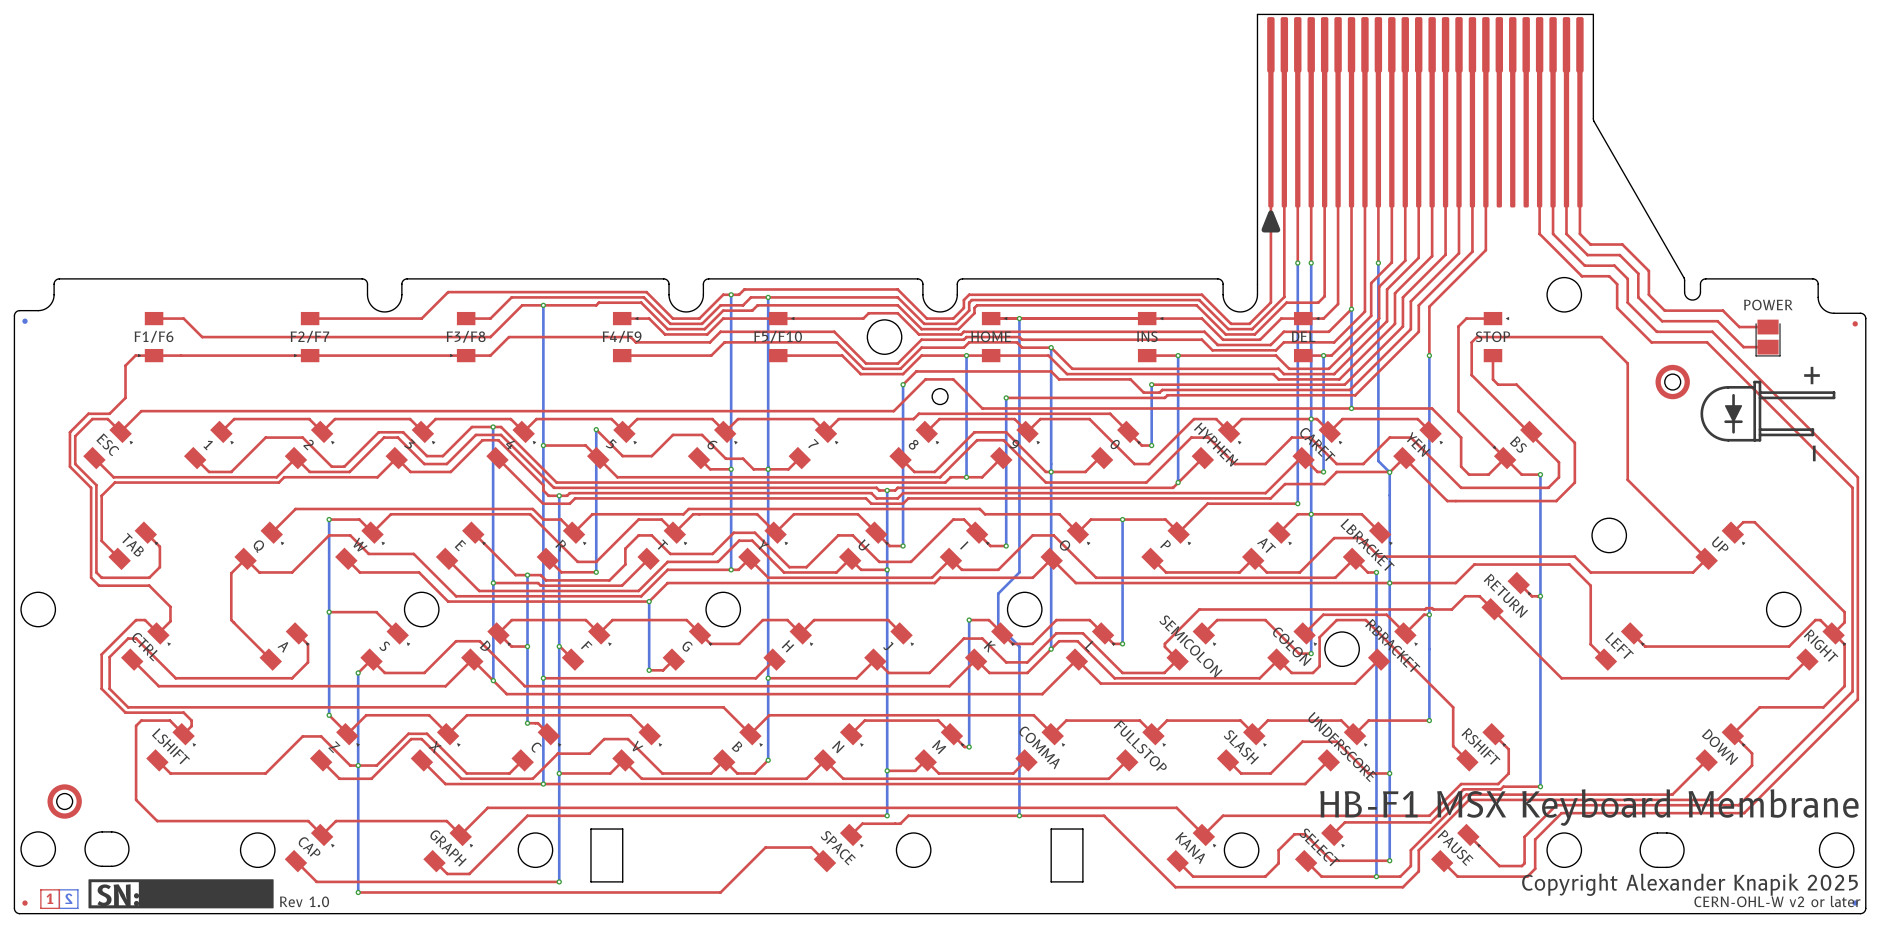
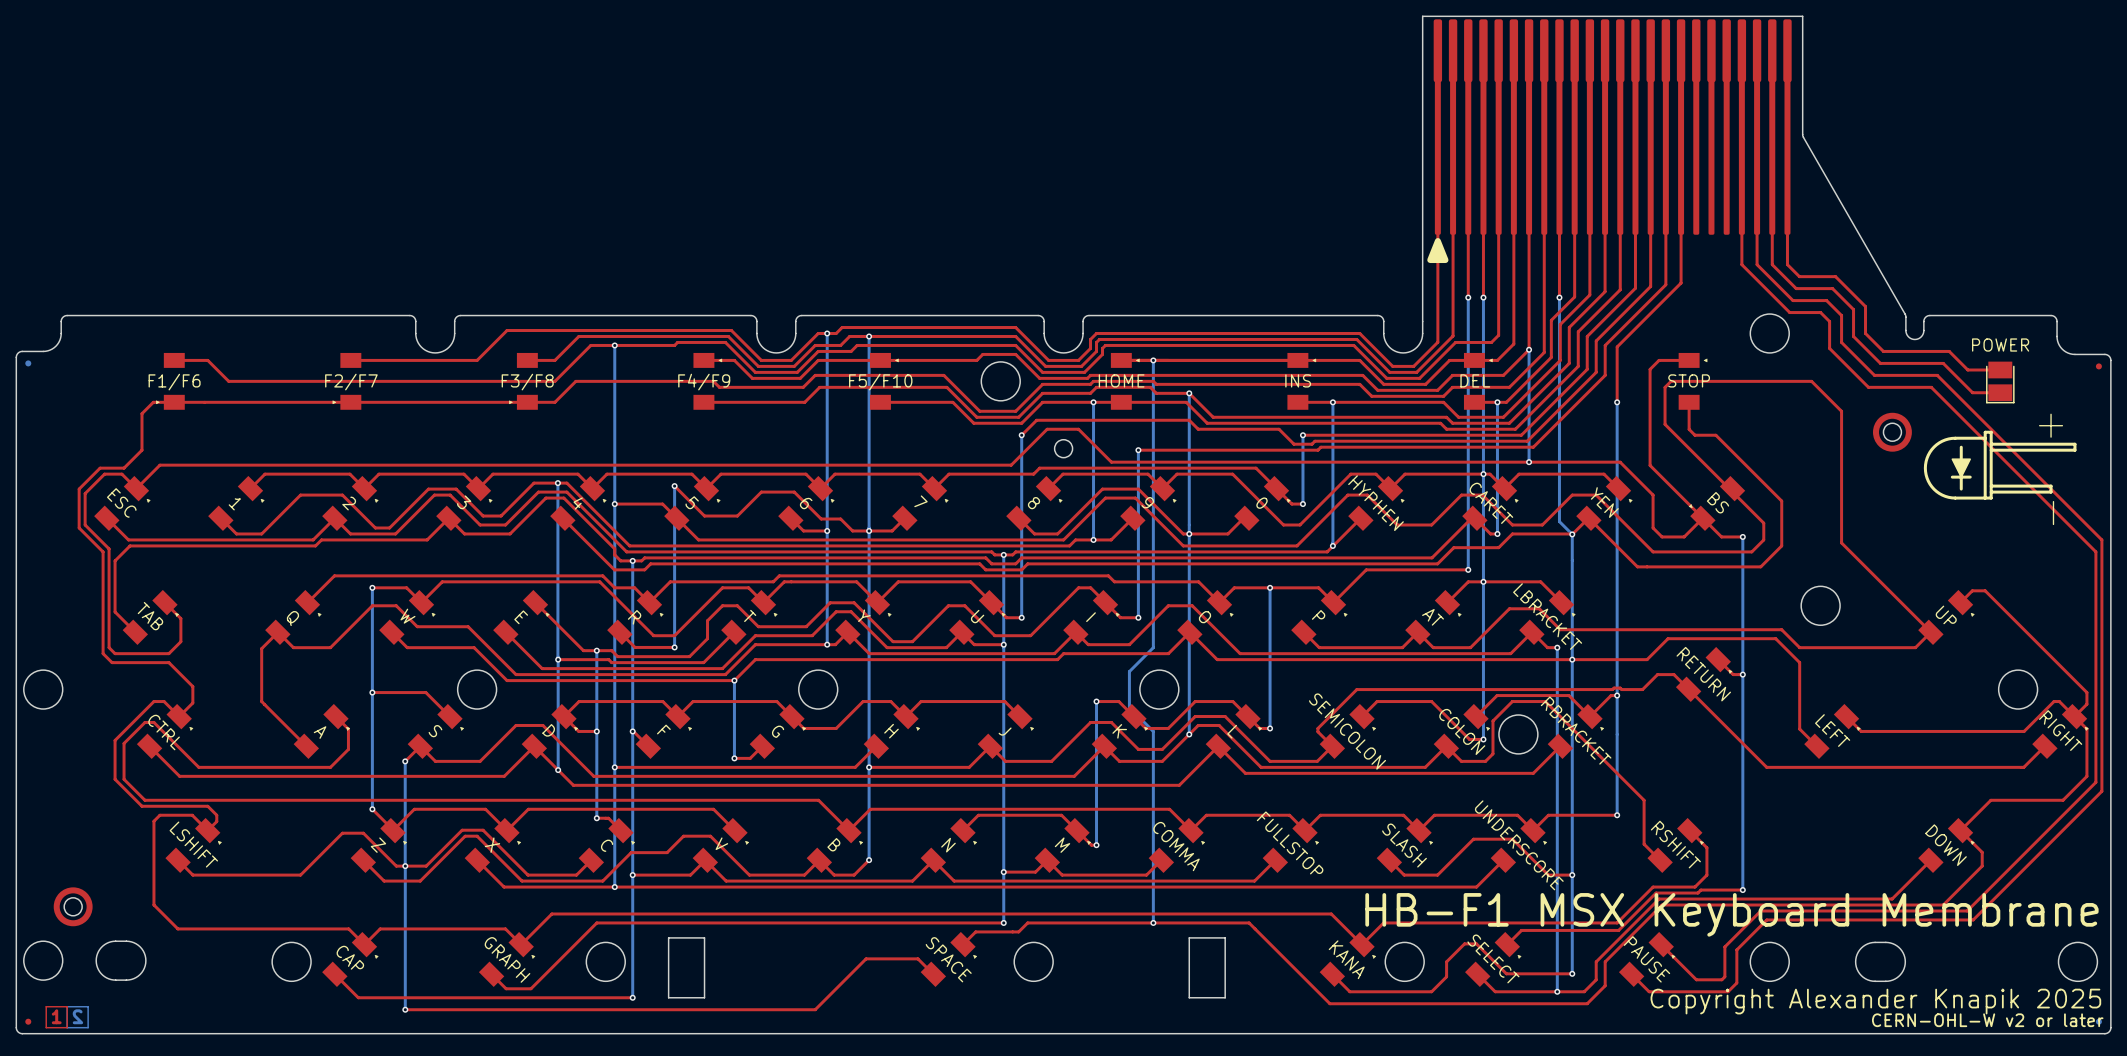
drawing: [88, 879, 274, 909] -> none
text: SN: (118, 895) -> none
text: Rev 1.0 (304, 901) -> none

